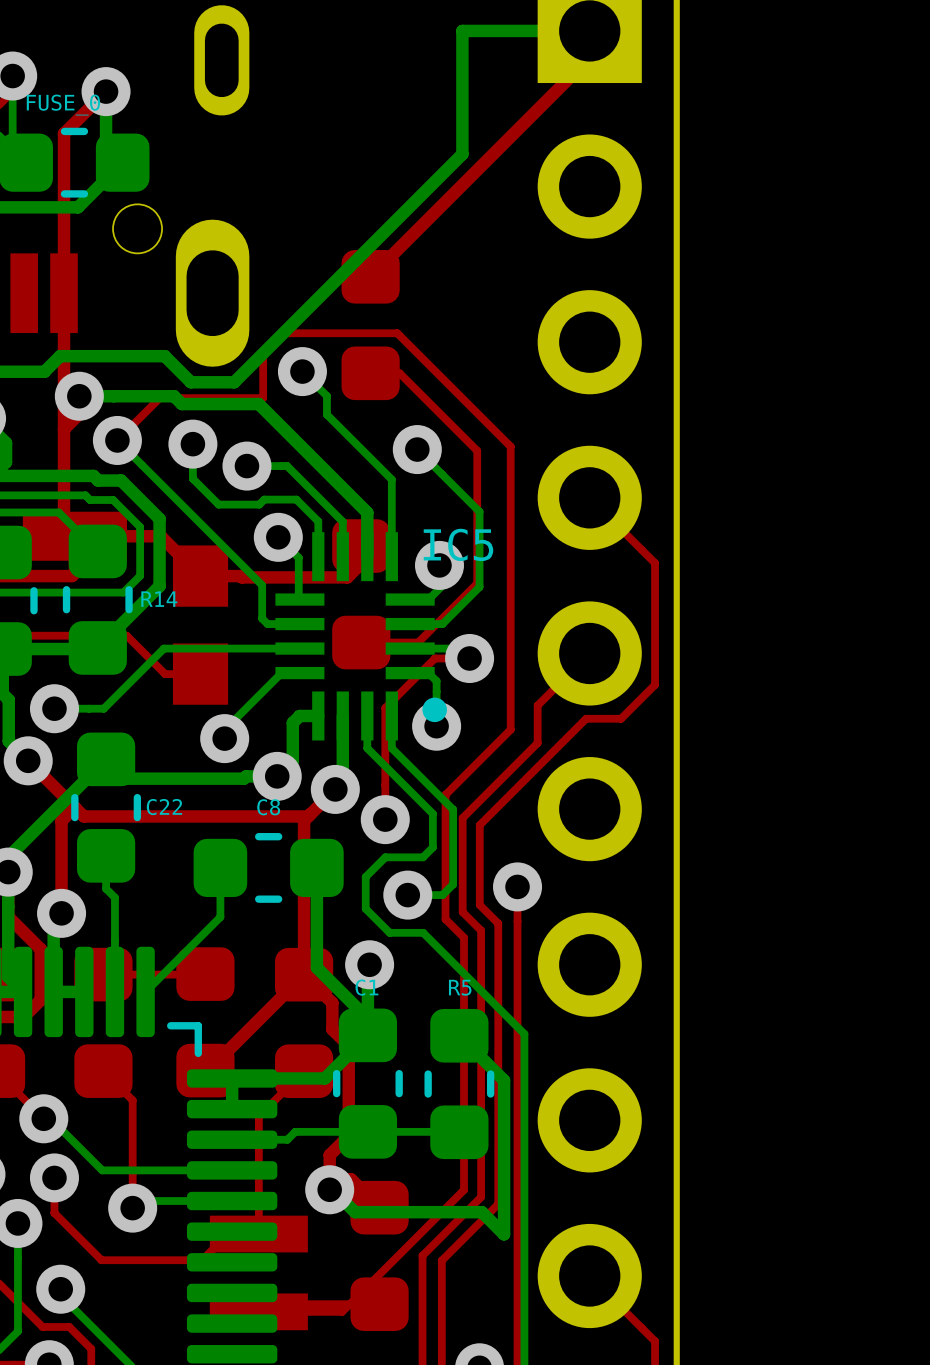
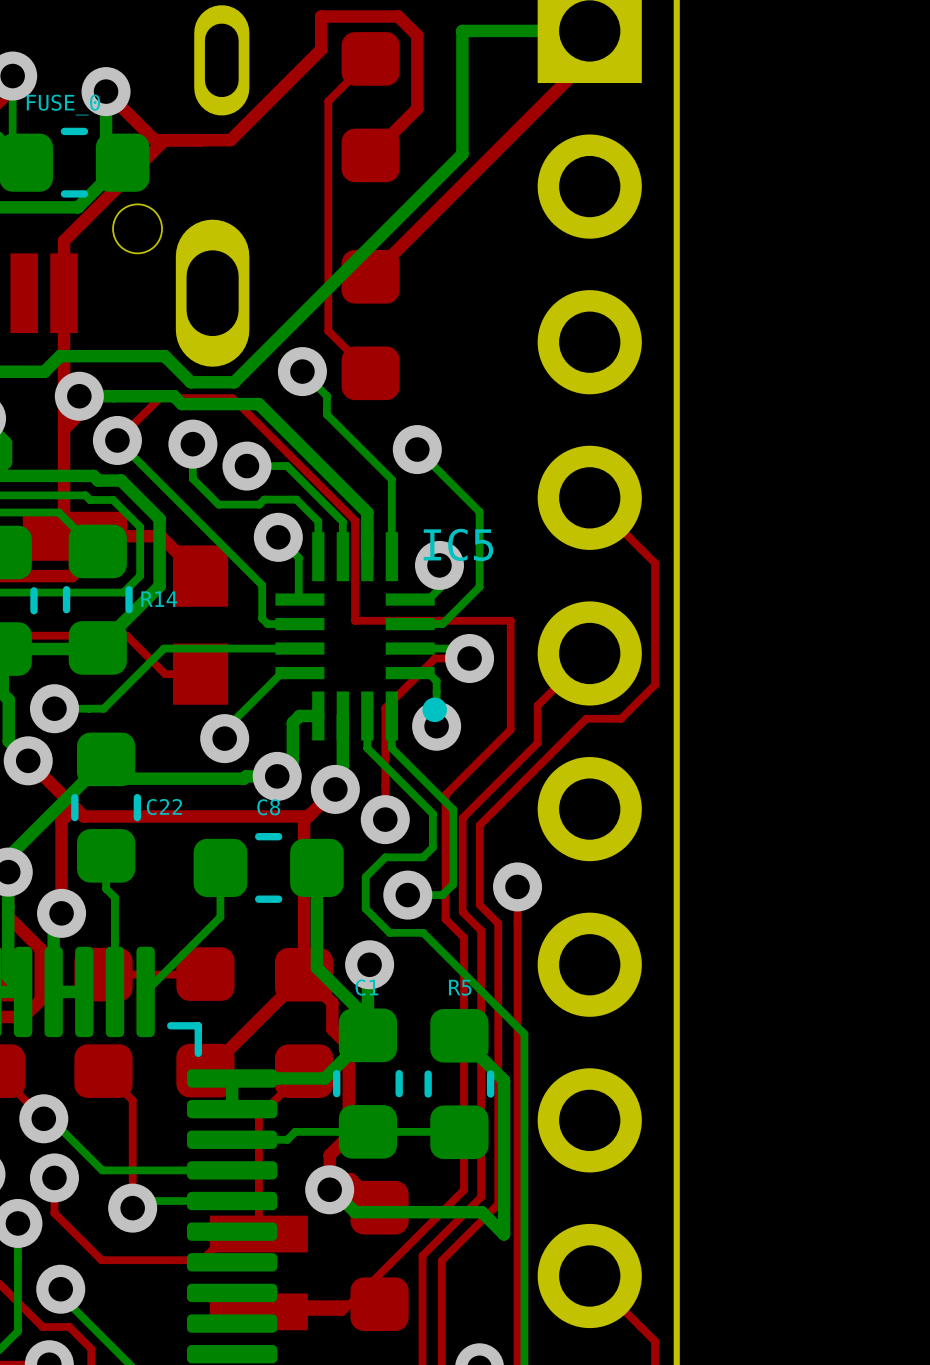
top track: (106, 91) (64, 133) (64, 240) -> (164, 140) (64, 240)
top track: none -> (106, 91) (154, 140) (230, 140) (321, 49) (321, 16) (398, 16) (417, 35) (417, 108) (370, 155)
top track: (370, 373) (399, 373) (477, 450) (477, 583) (418, 642) (361, 642) -> (370, 373) (328, 330) (328, 101) (370, 58)
top track: (232, 398) (263, 398) (263, 355) (284, 333) (397, 333) (510, 446) (510, 620) -> (232, 398) (355, 520) (355, 620) (510, 620)
top track: (361, 536) (361, 563) (347, 577) (200, 576) -> none
part position: (361, 594) -> (370, 107)

